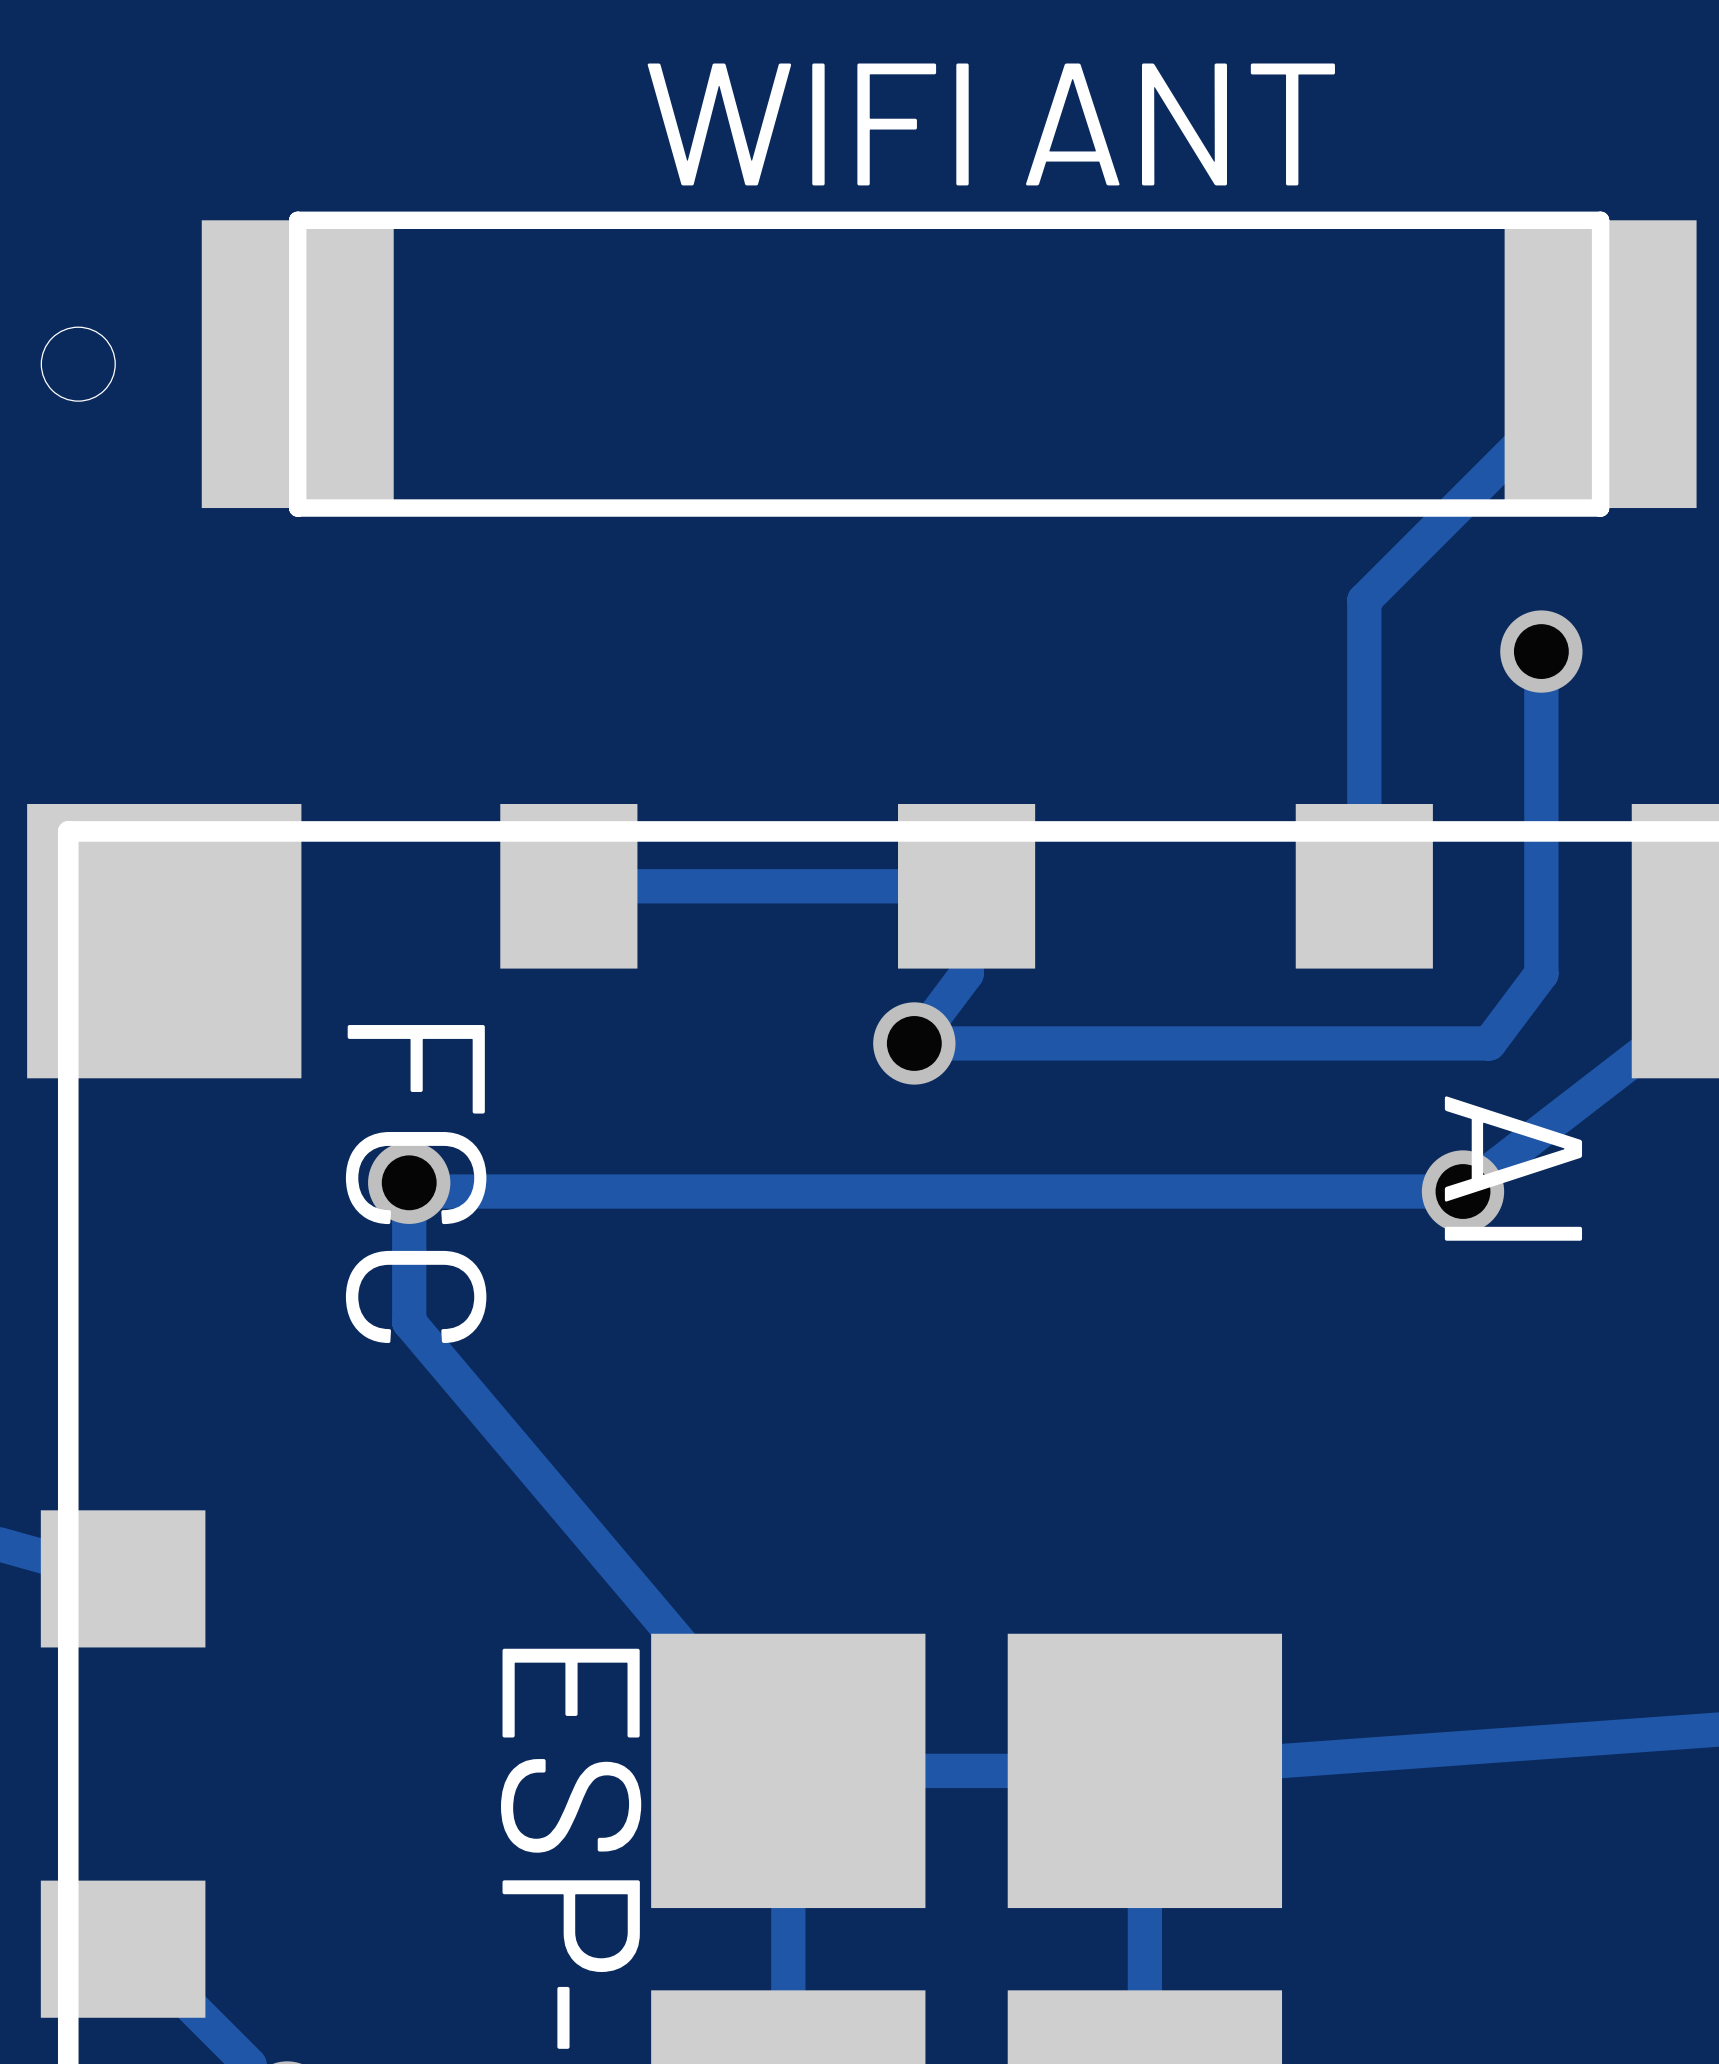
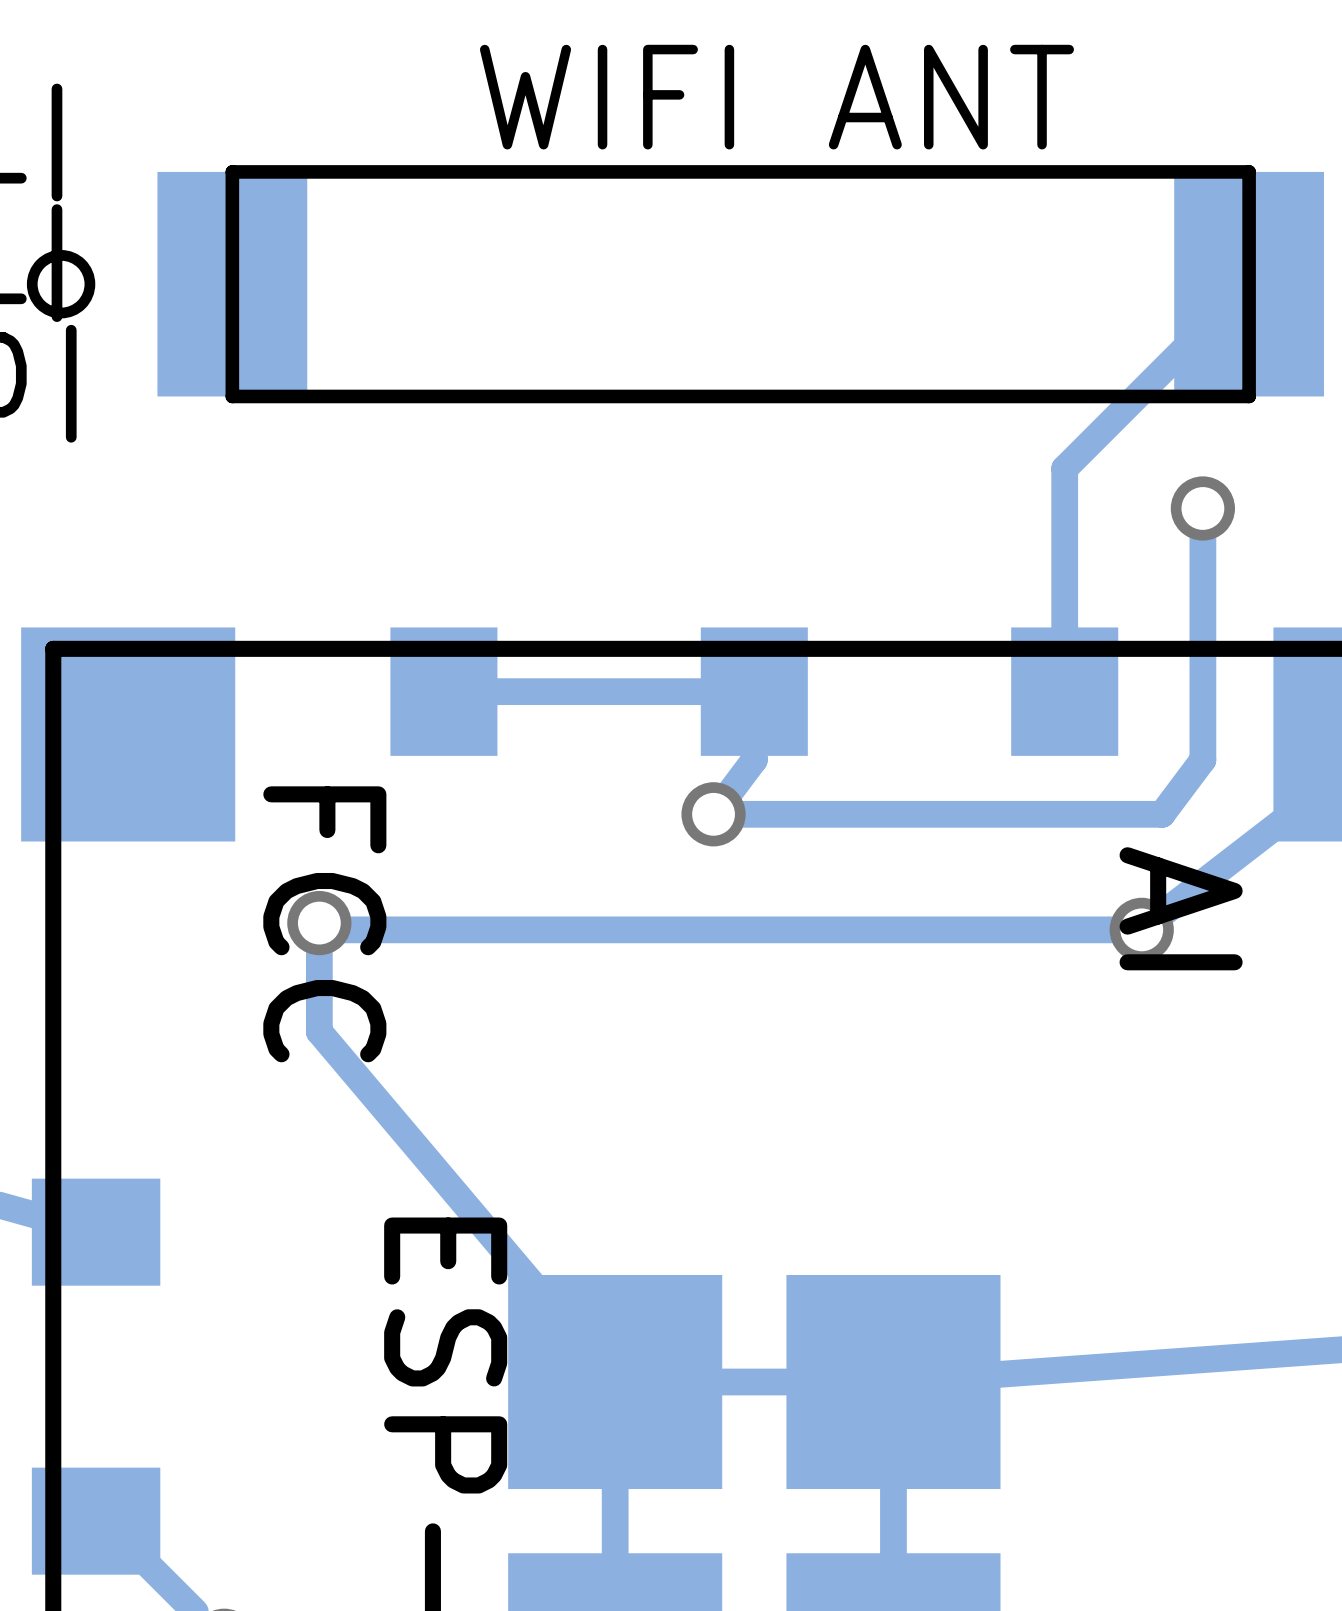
WIFI ANT footprint: [41, 211, 1697, 517] -> [26, 165, 1325, 404]

